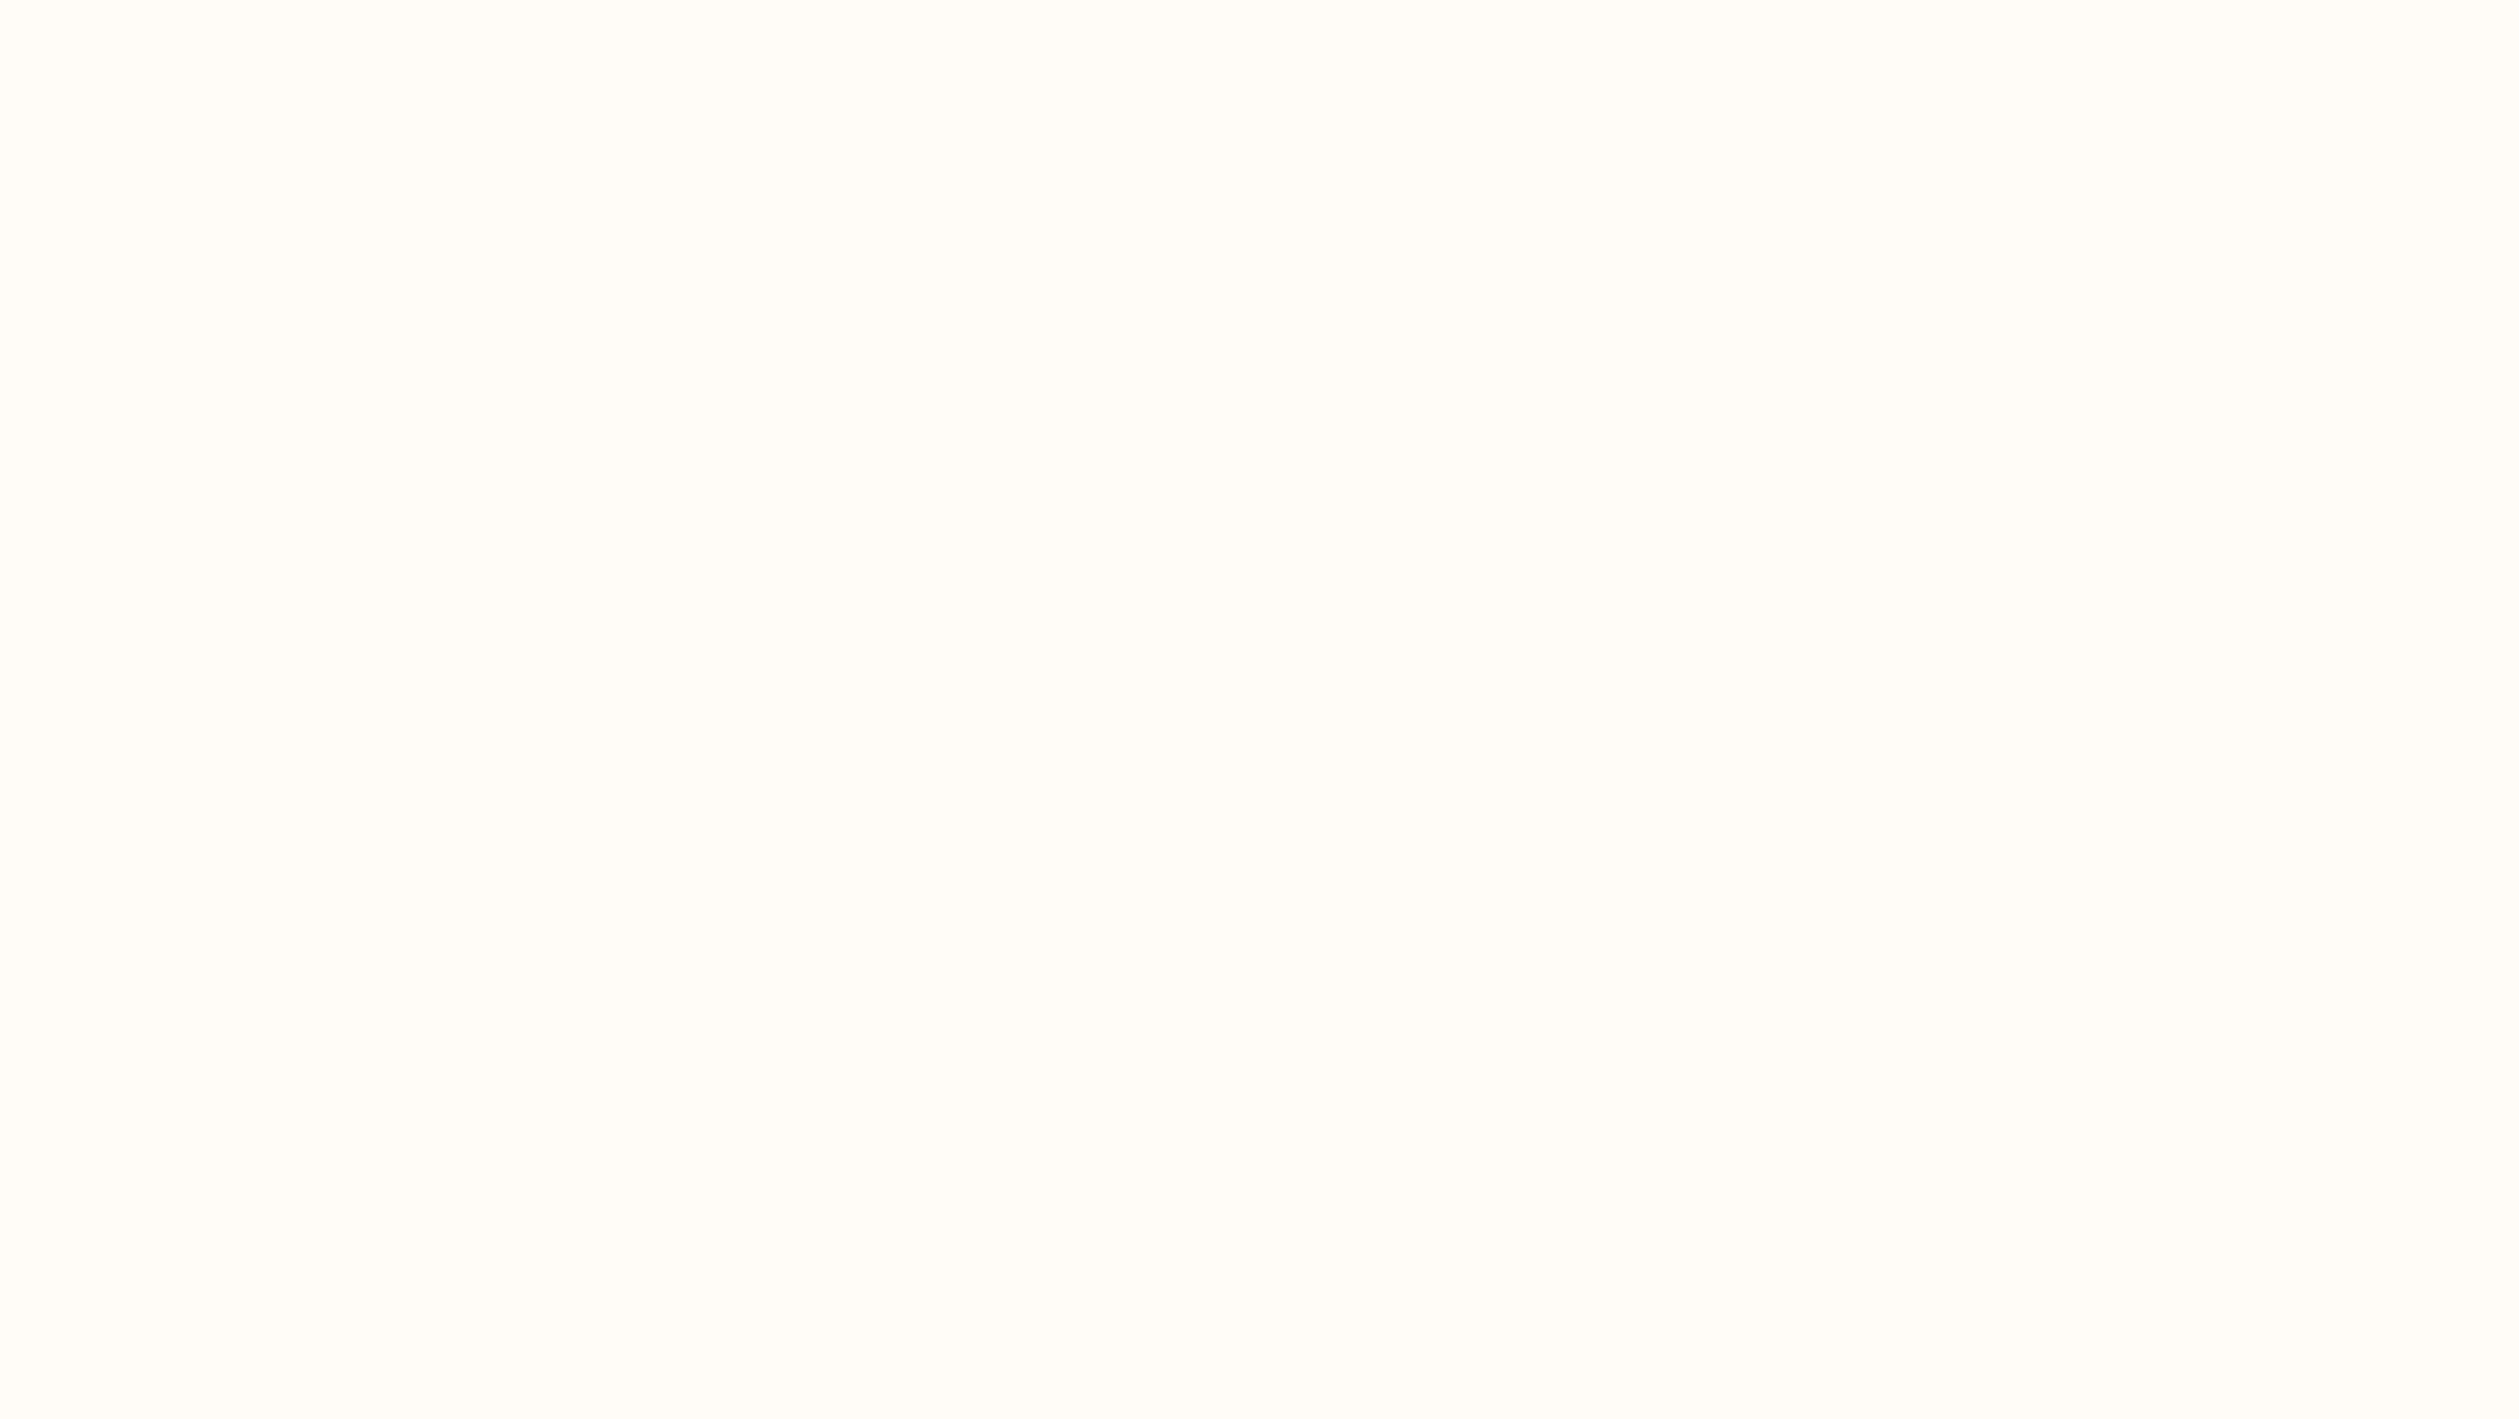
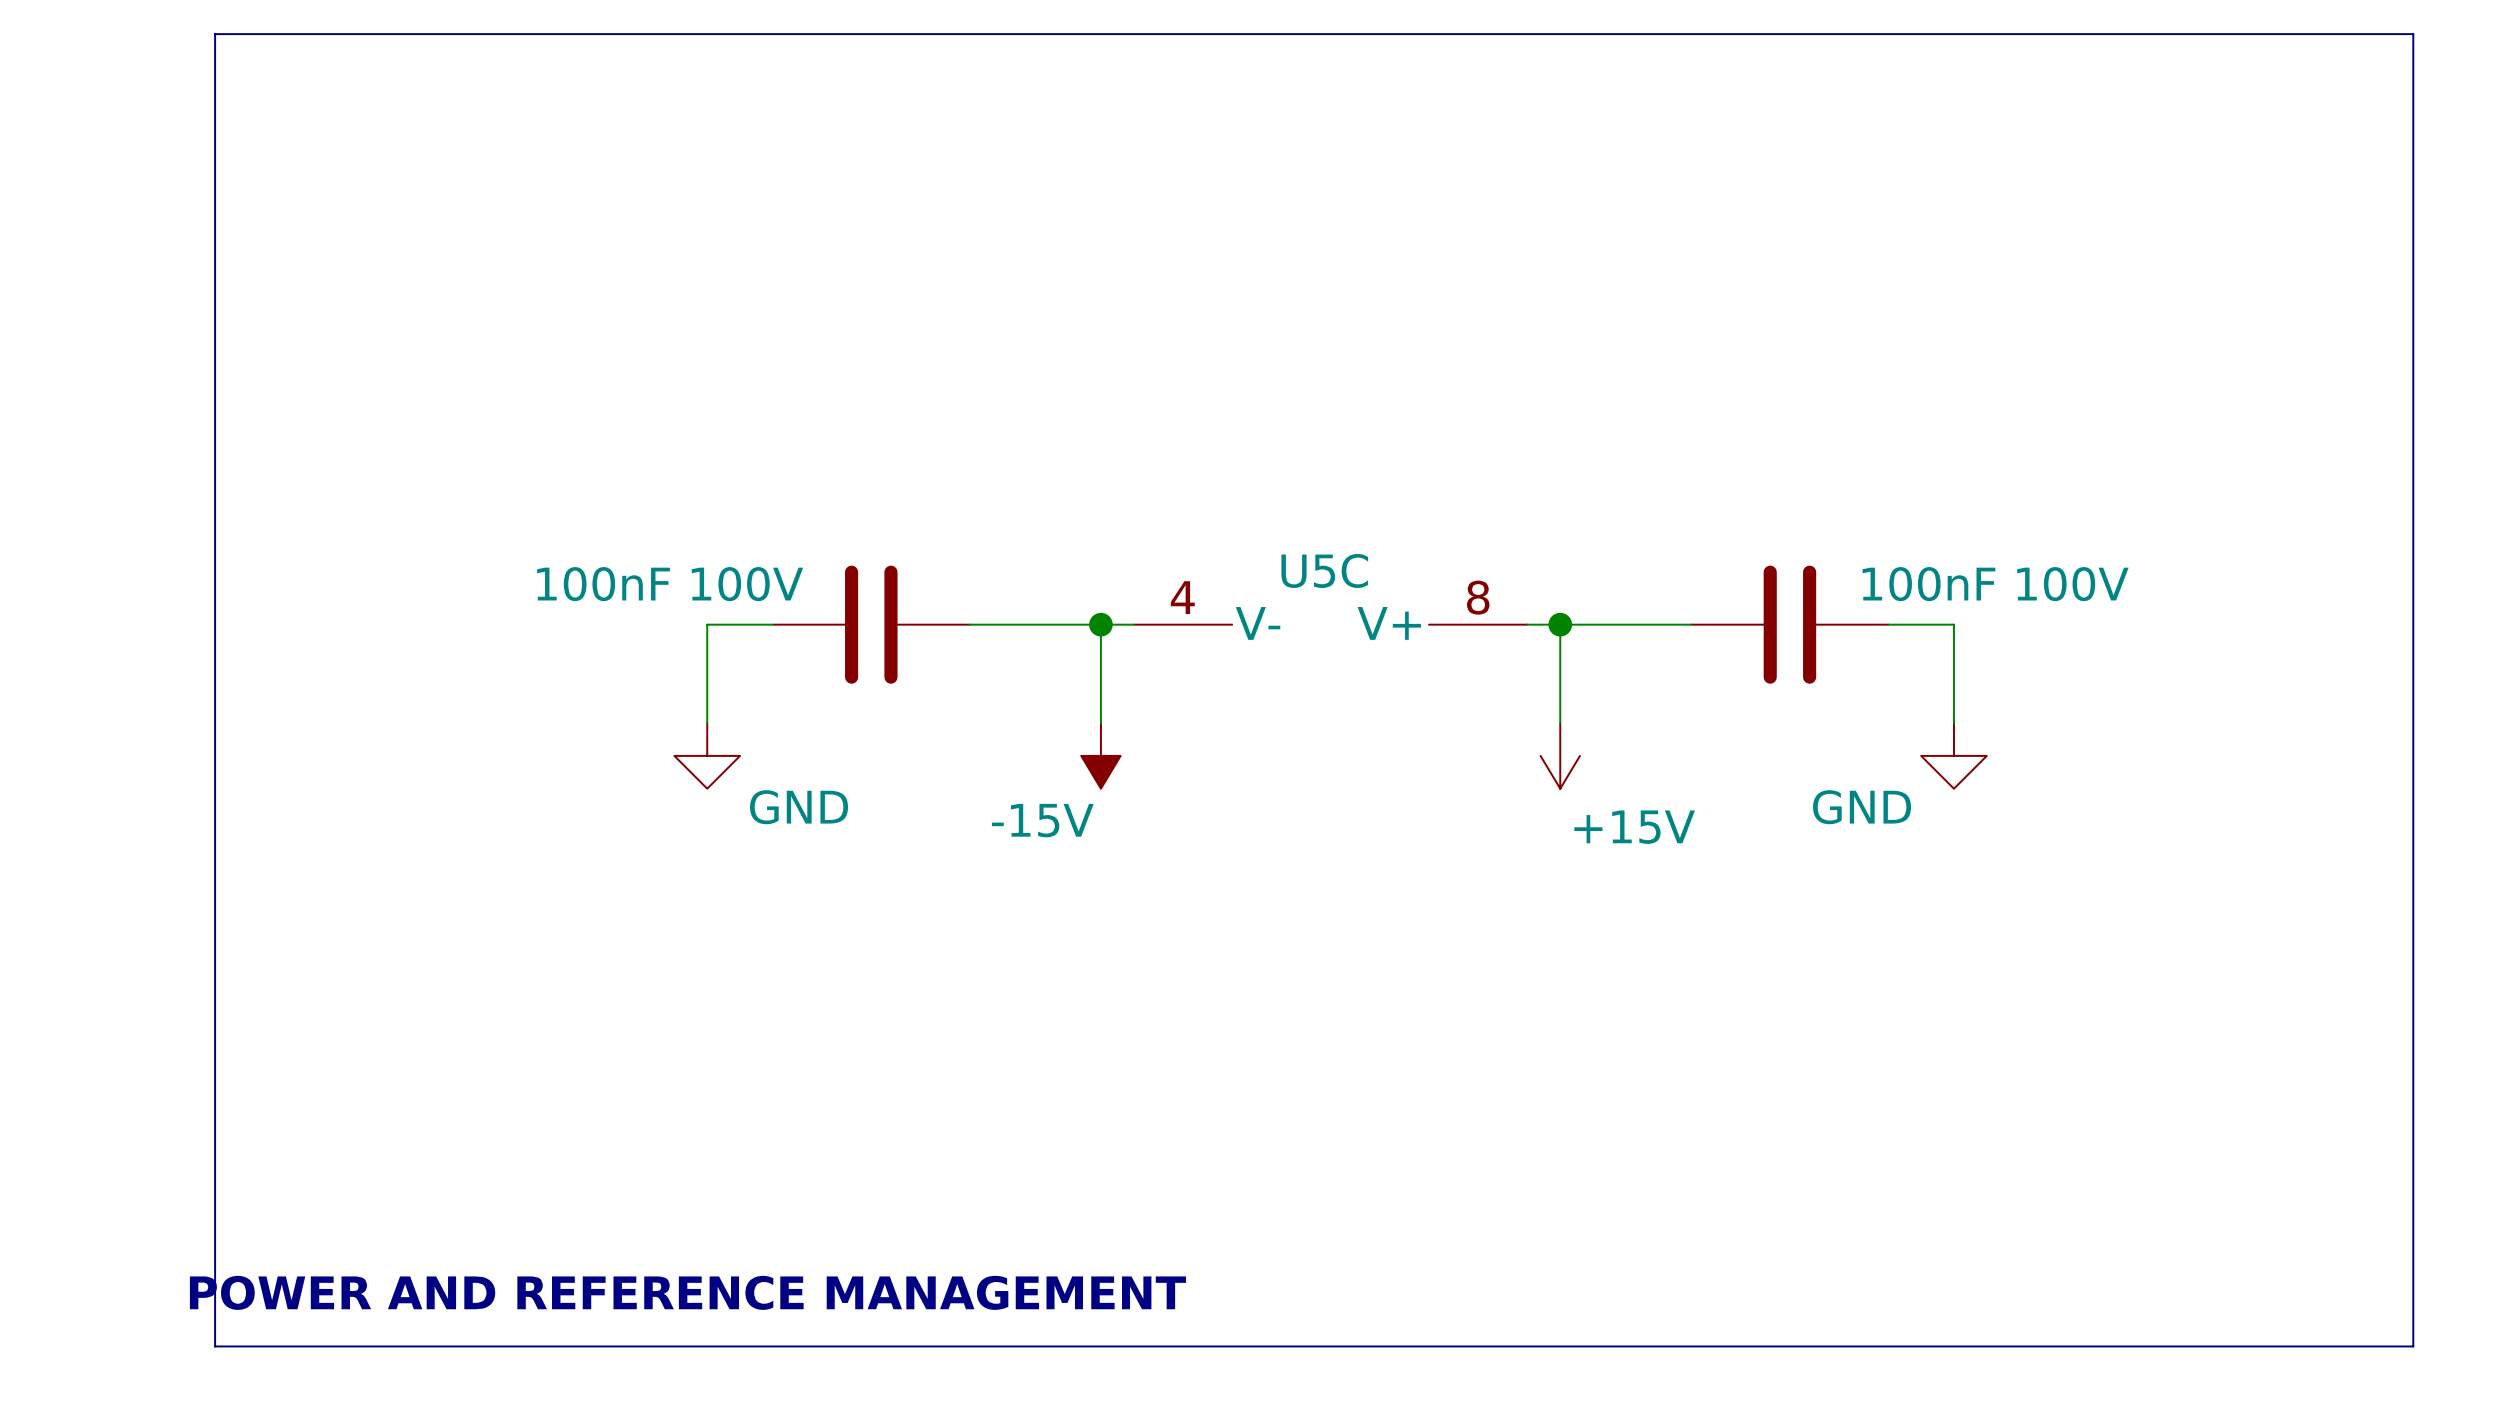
line: none -> (215, 34) (2413, 34) (2413, 1346) (215, 1346) (215, 34)
wire: none -> (772, 624) (707, 624) (707, 723)
part: none -> 100nF 100V (871, 624)
wire: none -> (969, 624) (1133, 624)
wire: none -> (1100, 624) (1100, 723)
junction: none -> (1100, 624)
U5C: none -> (1330, 624)
wire: none -> (1527, 624) (1691, 624)
wire: none -> (1560, 624) (1560, 723)
junction: none -> (1560, 624)
part: none -> 100nF 100V (1789, 624)
wire: none -> (1888, 624) (1953, 624) (1953, 723)
power symbol: none -> GND (707, 755)
power symbol: none -> -15V (1100, 755)
power symbol: none -> +15V (1560, 755)
power symbol: none -> GND (1953, 755)
text: none -> POWER AND REFERENCE MANAGEMENT (687, 1292)

